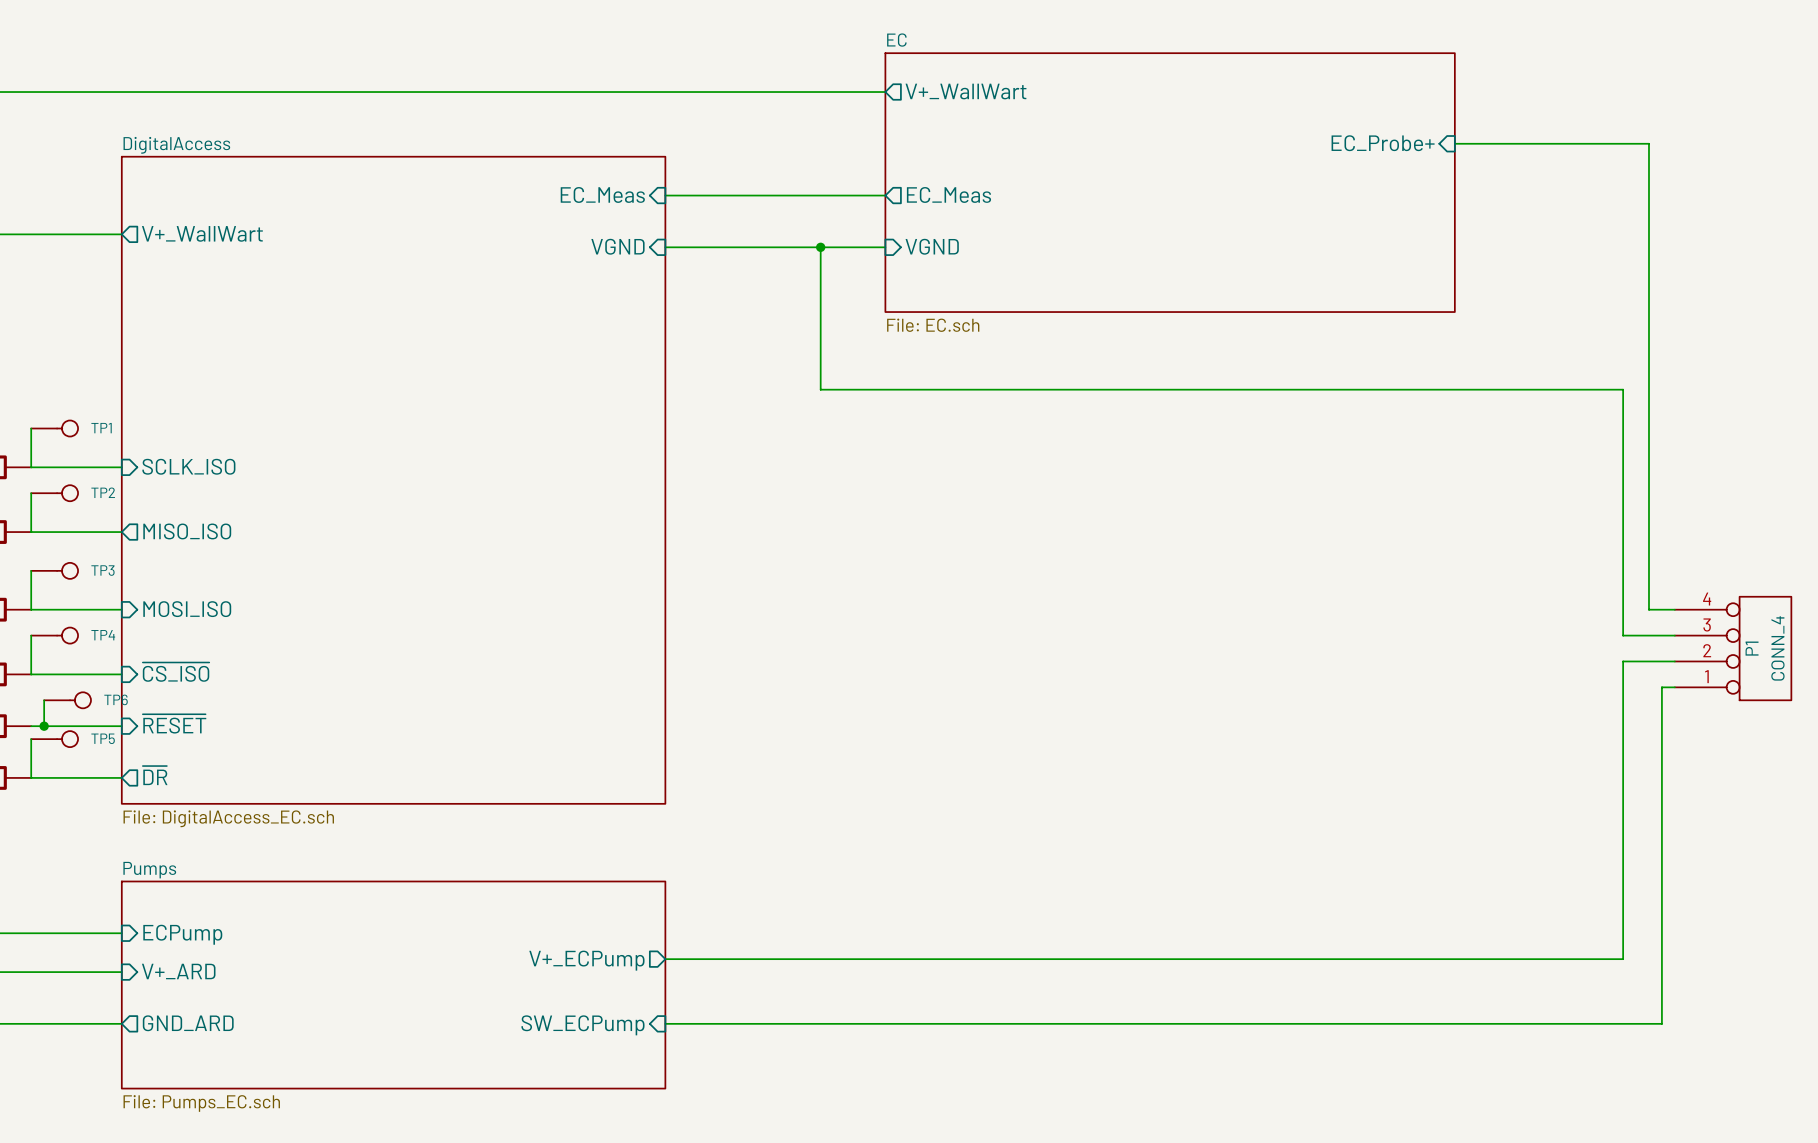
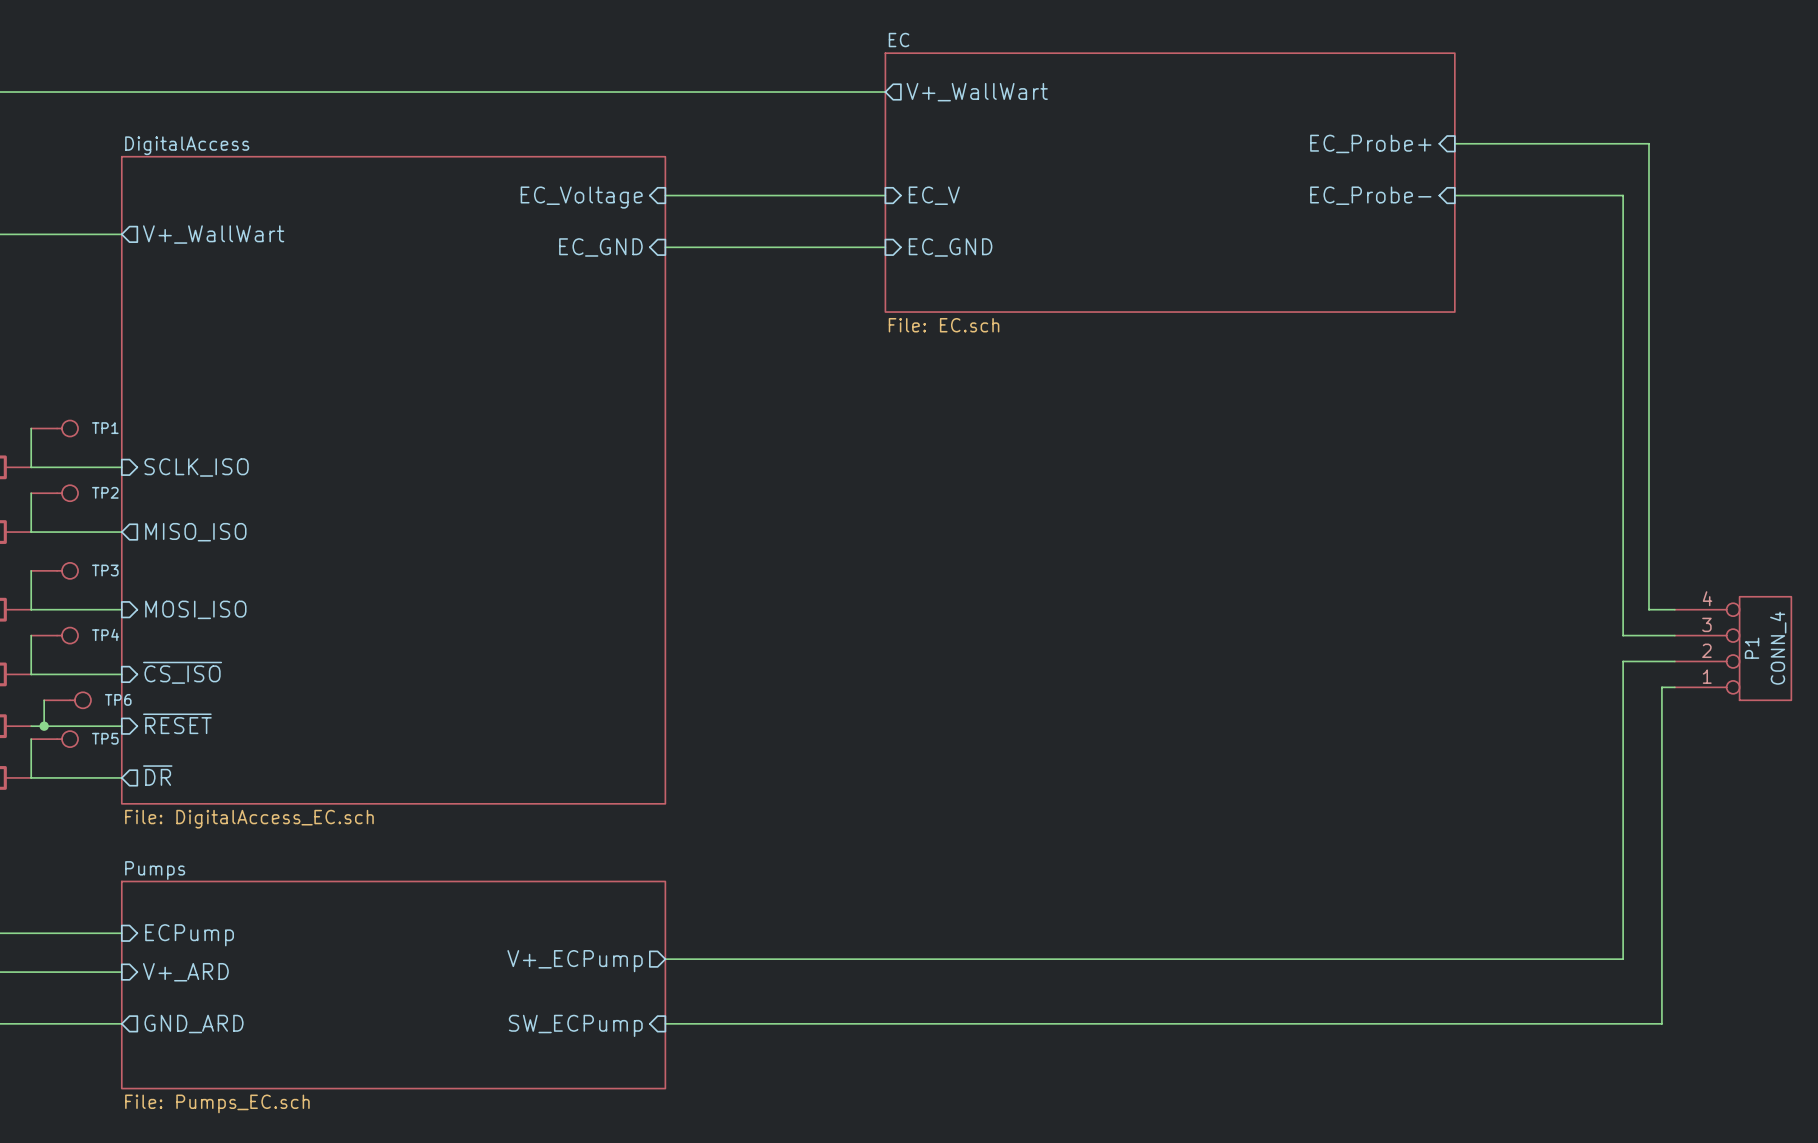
sheet pin: EC_Meas (602, 194) -> EC_Voltage (581, 197)
sheet pin shape: output (948, 194) -> input (934, 195)
sheet pin: EC_Meas (948, 194) -> EC_V (934, 195)
sheet pin: none -> EC_Probe- (1370, 195)
sheet pin: VGND (617, 246) -> EC_GND (600, 247)
sheet pin: VGND (932, 246) -> EC_GND (950, 247)
wire: (820, 247) (820, 389) (1623, 389) -> (1454, 195) (1623, 195) (1623, 389)
junction: (820, 247) -> none

